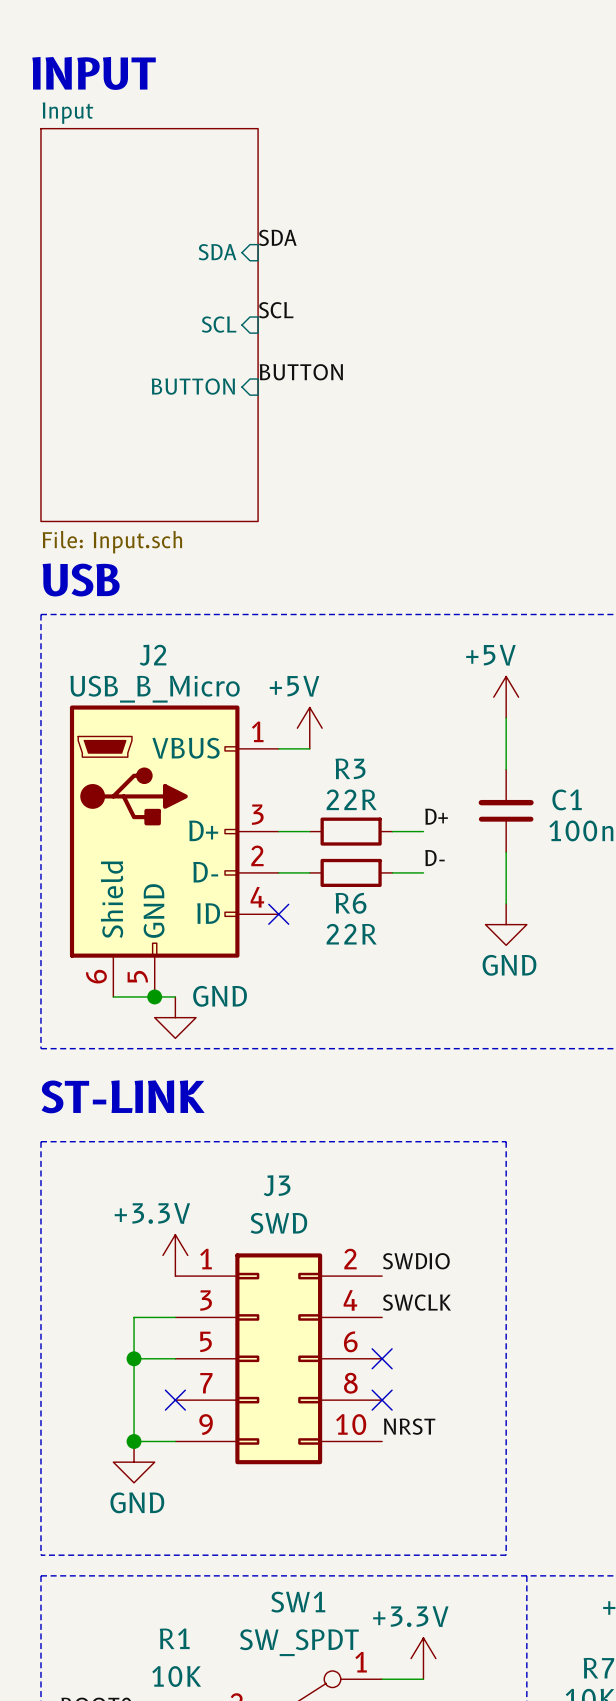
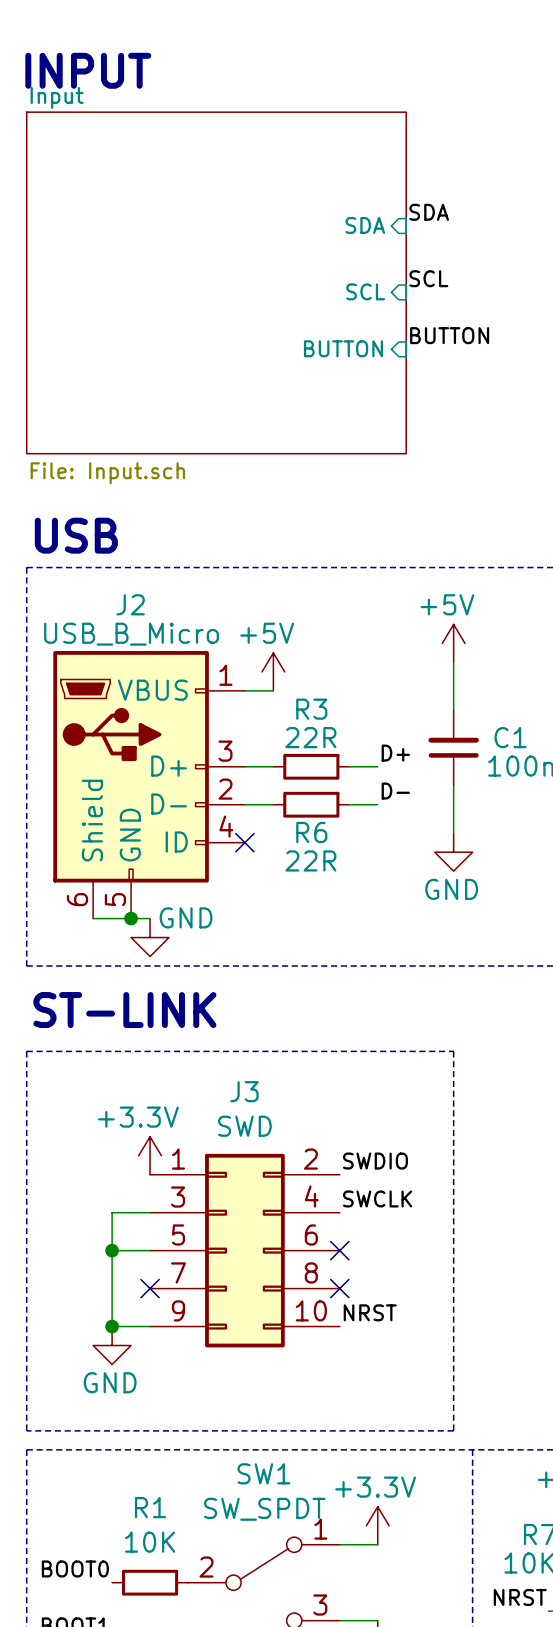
label position: SDA (277, 237) -> SDA (429, 212)
sheet pin position: SDA (217, 252) -> SDA (365, 225)
sheet Input: none -> File: Input.sch (216, 282)
label position: SCL (276, 310) -> SCL (428, 278)
sheet pin position: SCL (219, 324) -> SCL (365, 291)
sheet Input: File: Input.sch (149, 325) -> none
label position: BUTTON (301, 372) -> BUTTON (449, 335)
sheet pin position: BUTTON (193, 386) -> BUTTON (343, 348)

